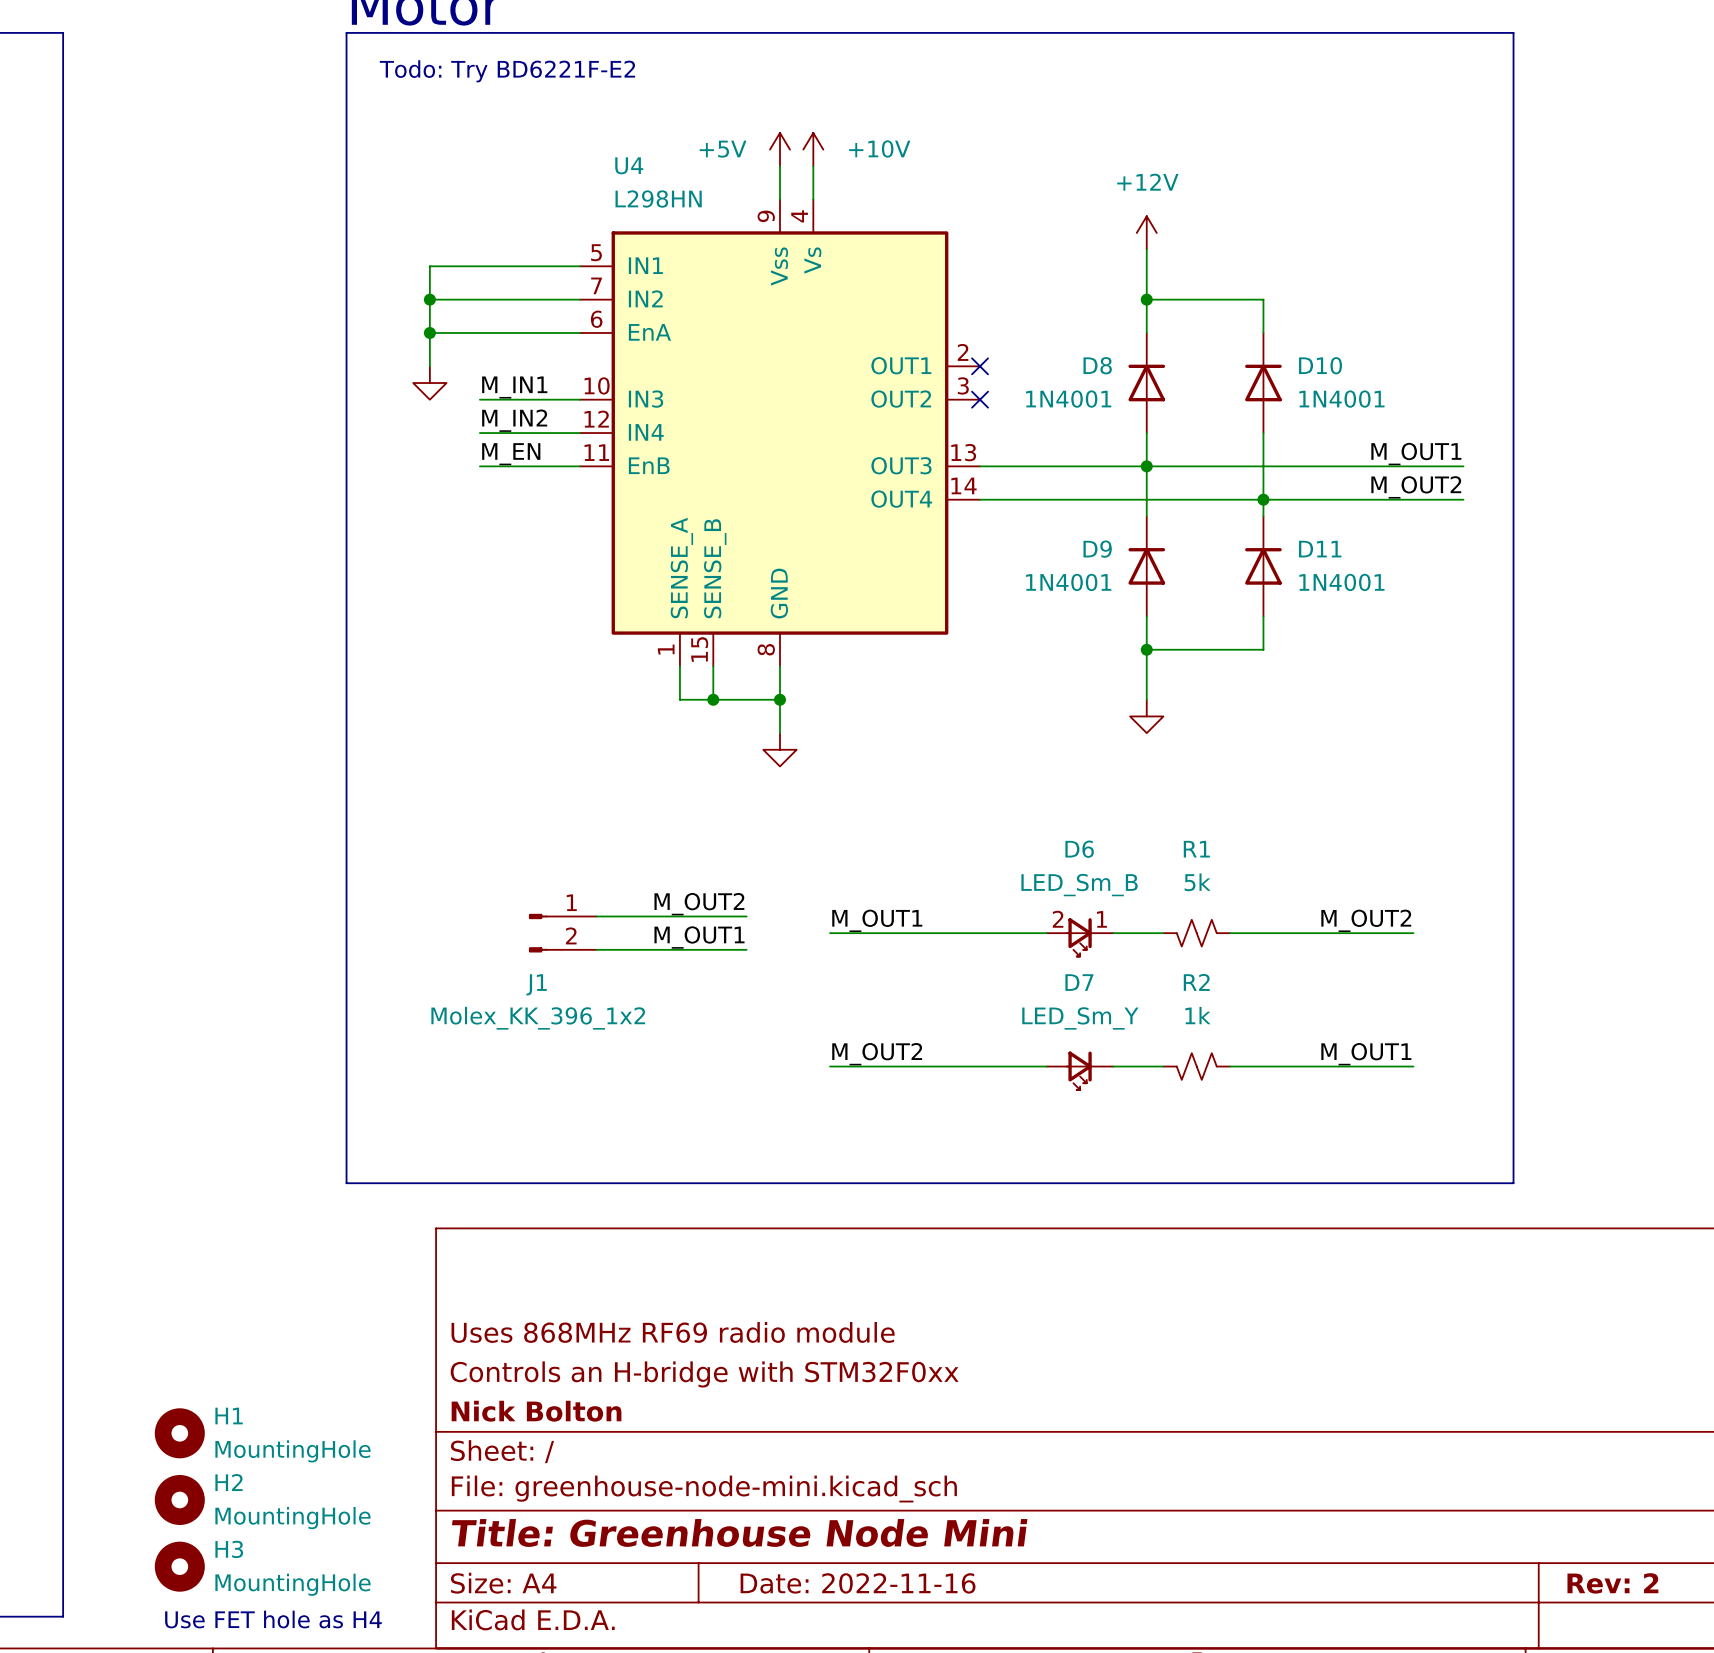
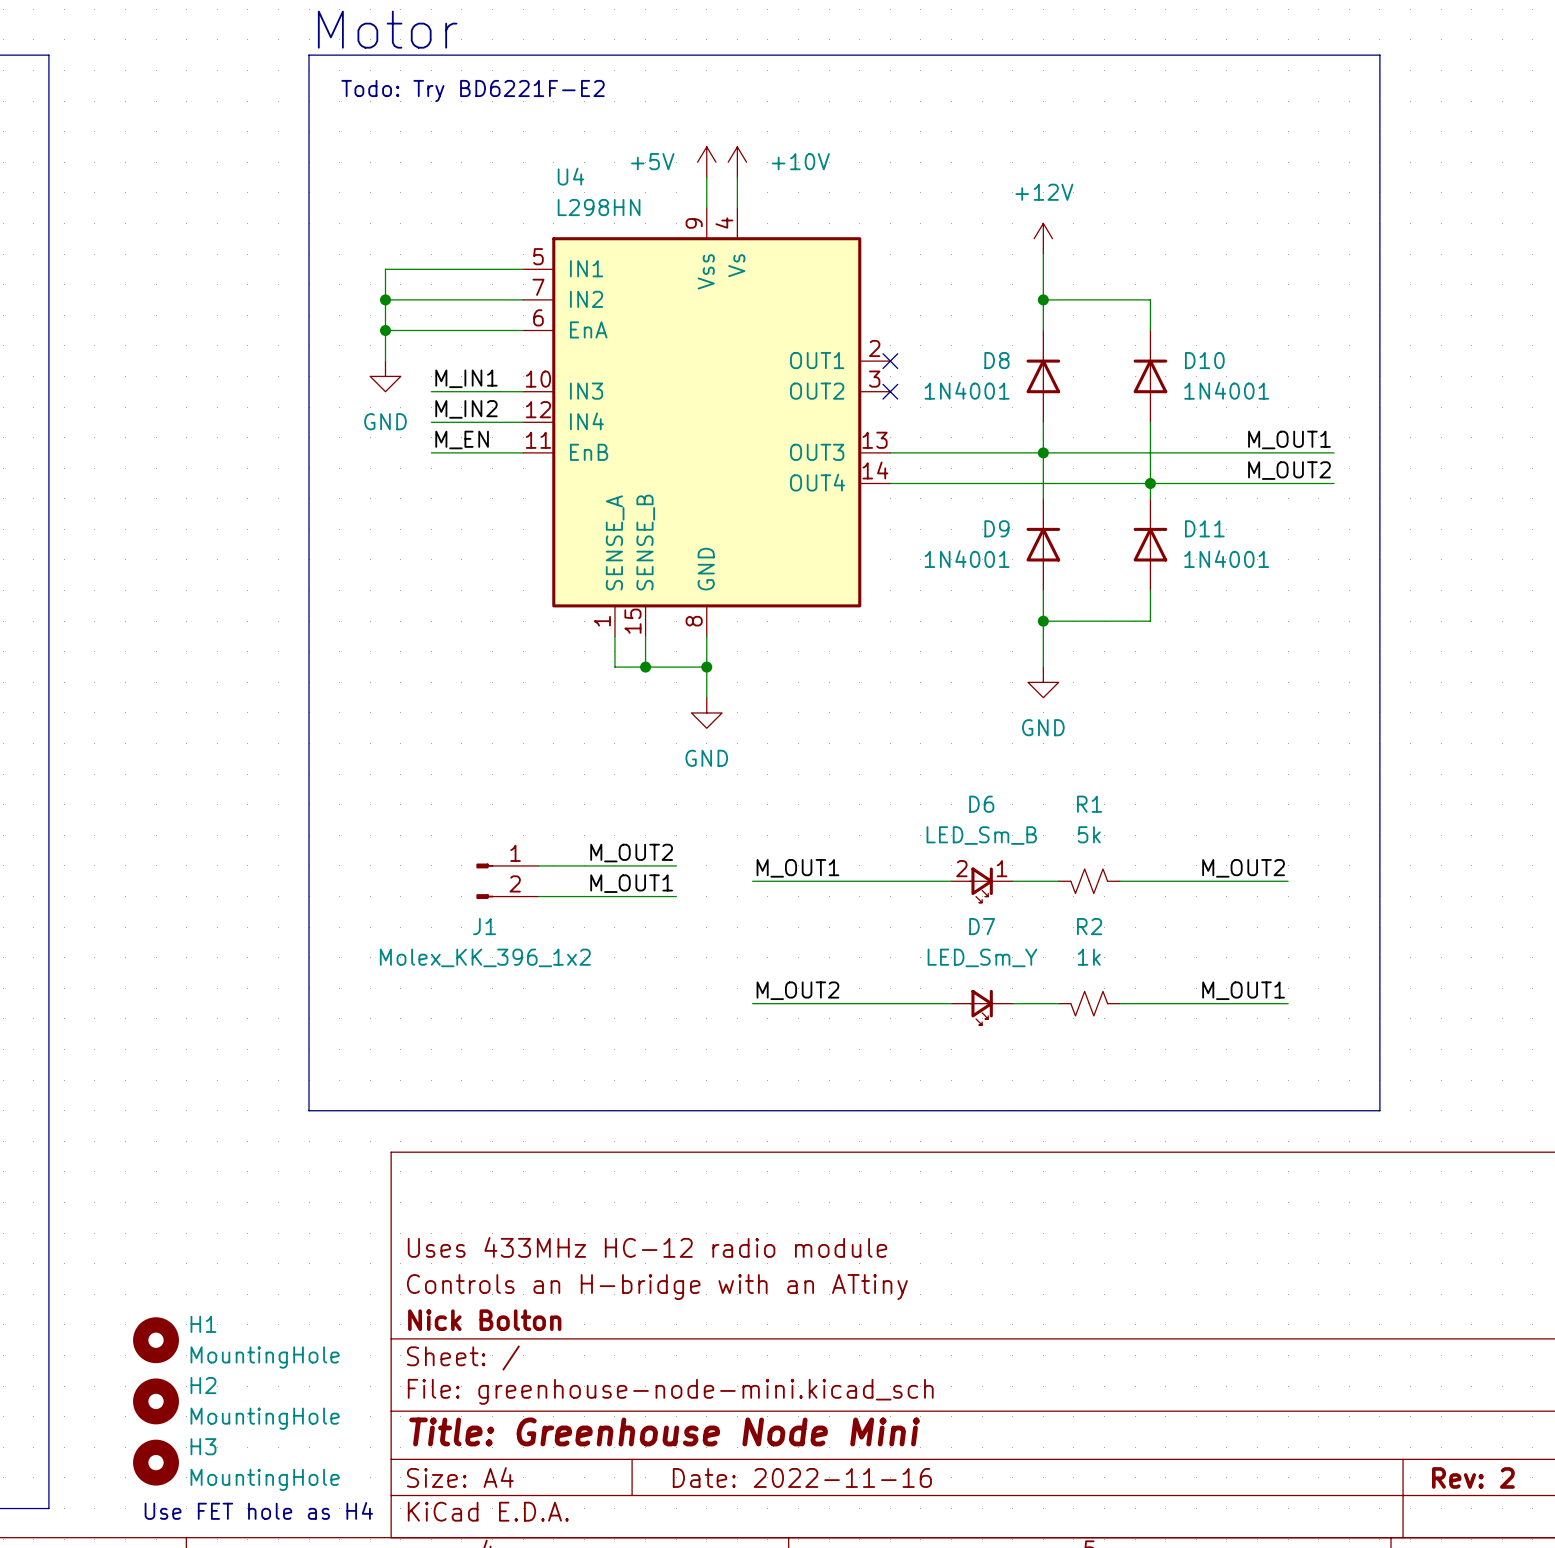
power symbol text: none -> GND (385, 421)
power symbol text: none -> GND (1043, 727)
power symbol text: none -> GND (706, 758)
title block: Uses 868MHz RF69 radio module (673, 1332) -> Uses 433MHz HC-12 radio module (647, 1247)
title block: Controls an H-bridge with STM32F0xx (704, 1374) -> Controls an H-bridge with an ATtiny (657, 1287)

